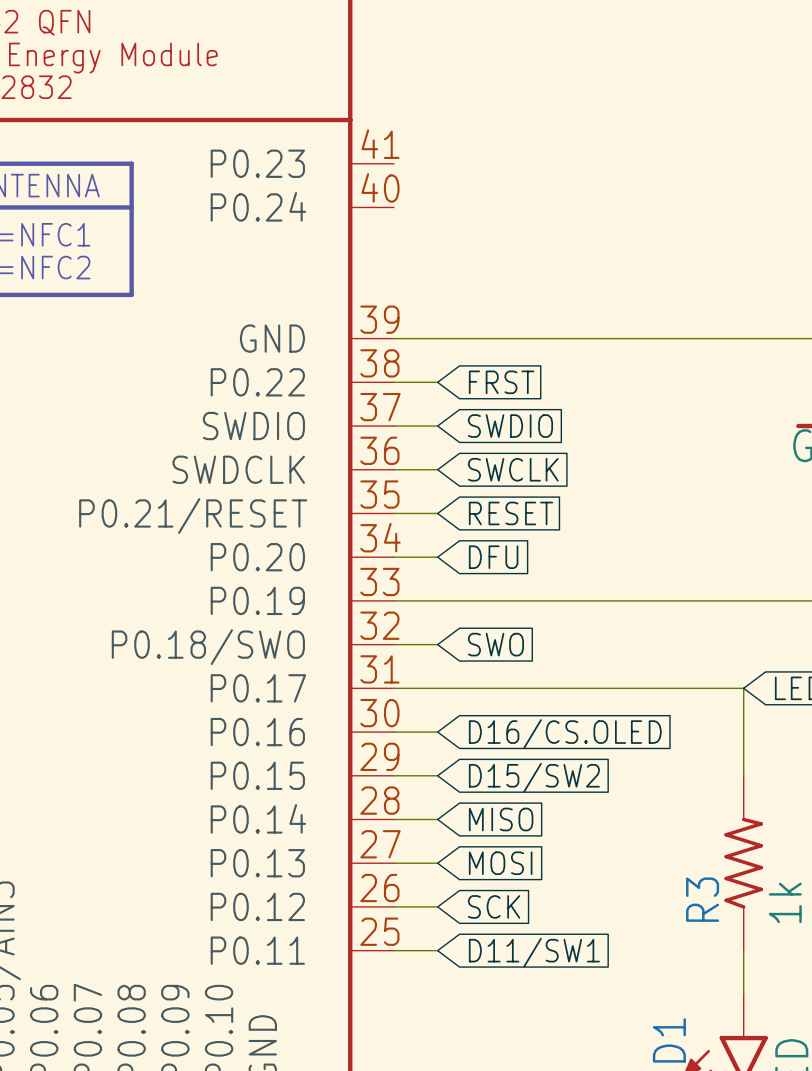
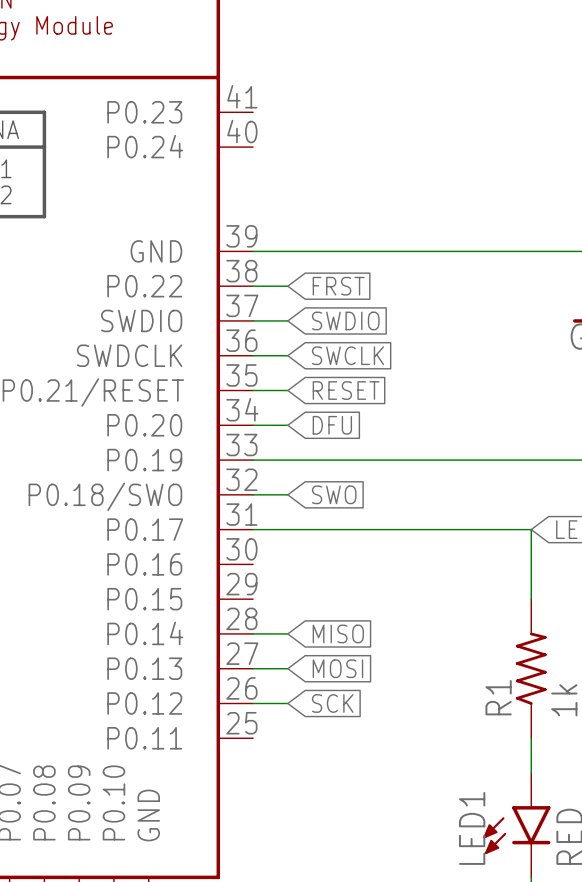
wire: (393, 732) (437, 732) -> none
global label: D16/CS.OLED (565, 734) -> none
wire: (393, 775) (437, 775) -> none
global label: D15/SW2 (534, 777) -> none
R3 name: R3 (702, 899) -> R1 (498, 697)
wire: (393, 950) (437, 950) -> none
global label: D11/SW1 (534, 952) -> none

